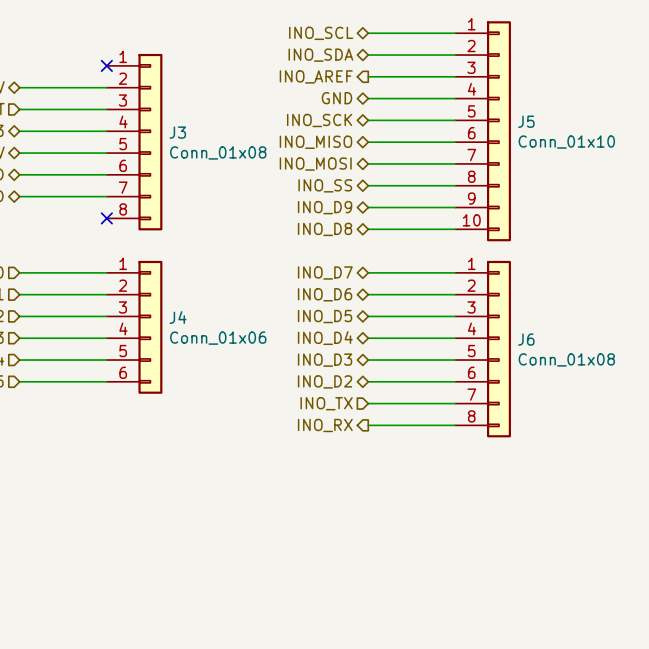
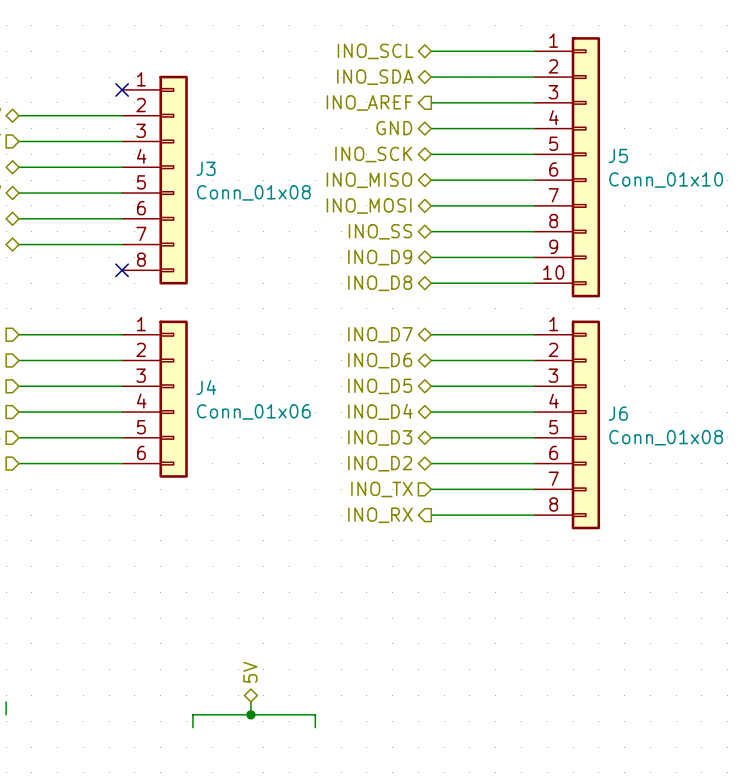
hierarchical label: none -> 5V (250, 672)
wire: none -> (6, 701) (6, 714)
wire: none -> (250, 701) (250, 714)
junction: none -> (250, 714)
wire: none -> (192, 727) (192, 714) (315, 714) (315, 727)

